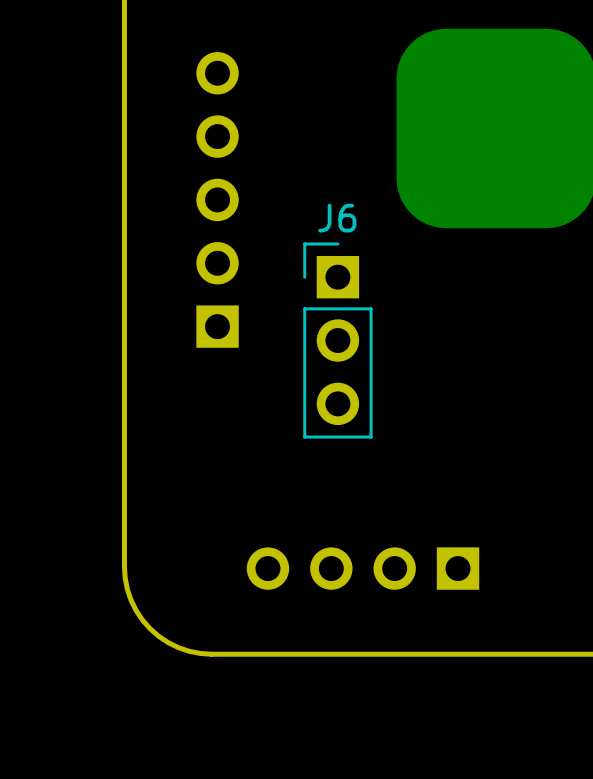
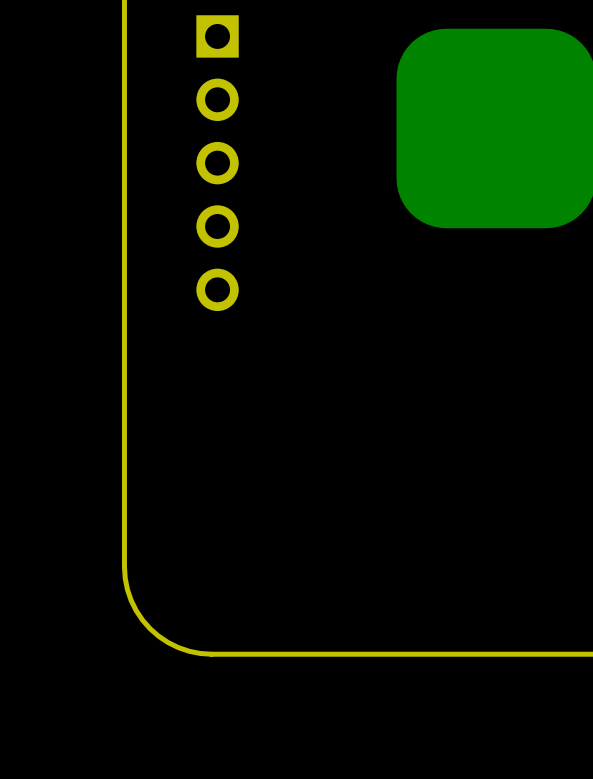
part rotation: 0° (217, 199) -> 180° (217, 163)
J6: (337, 340) -> none
part: (363, 568) -> none

